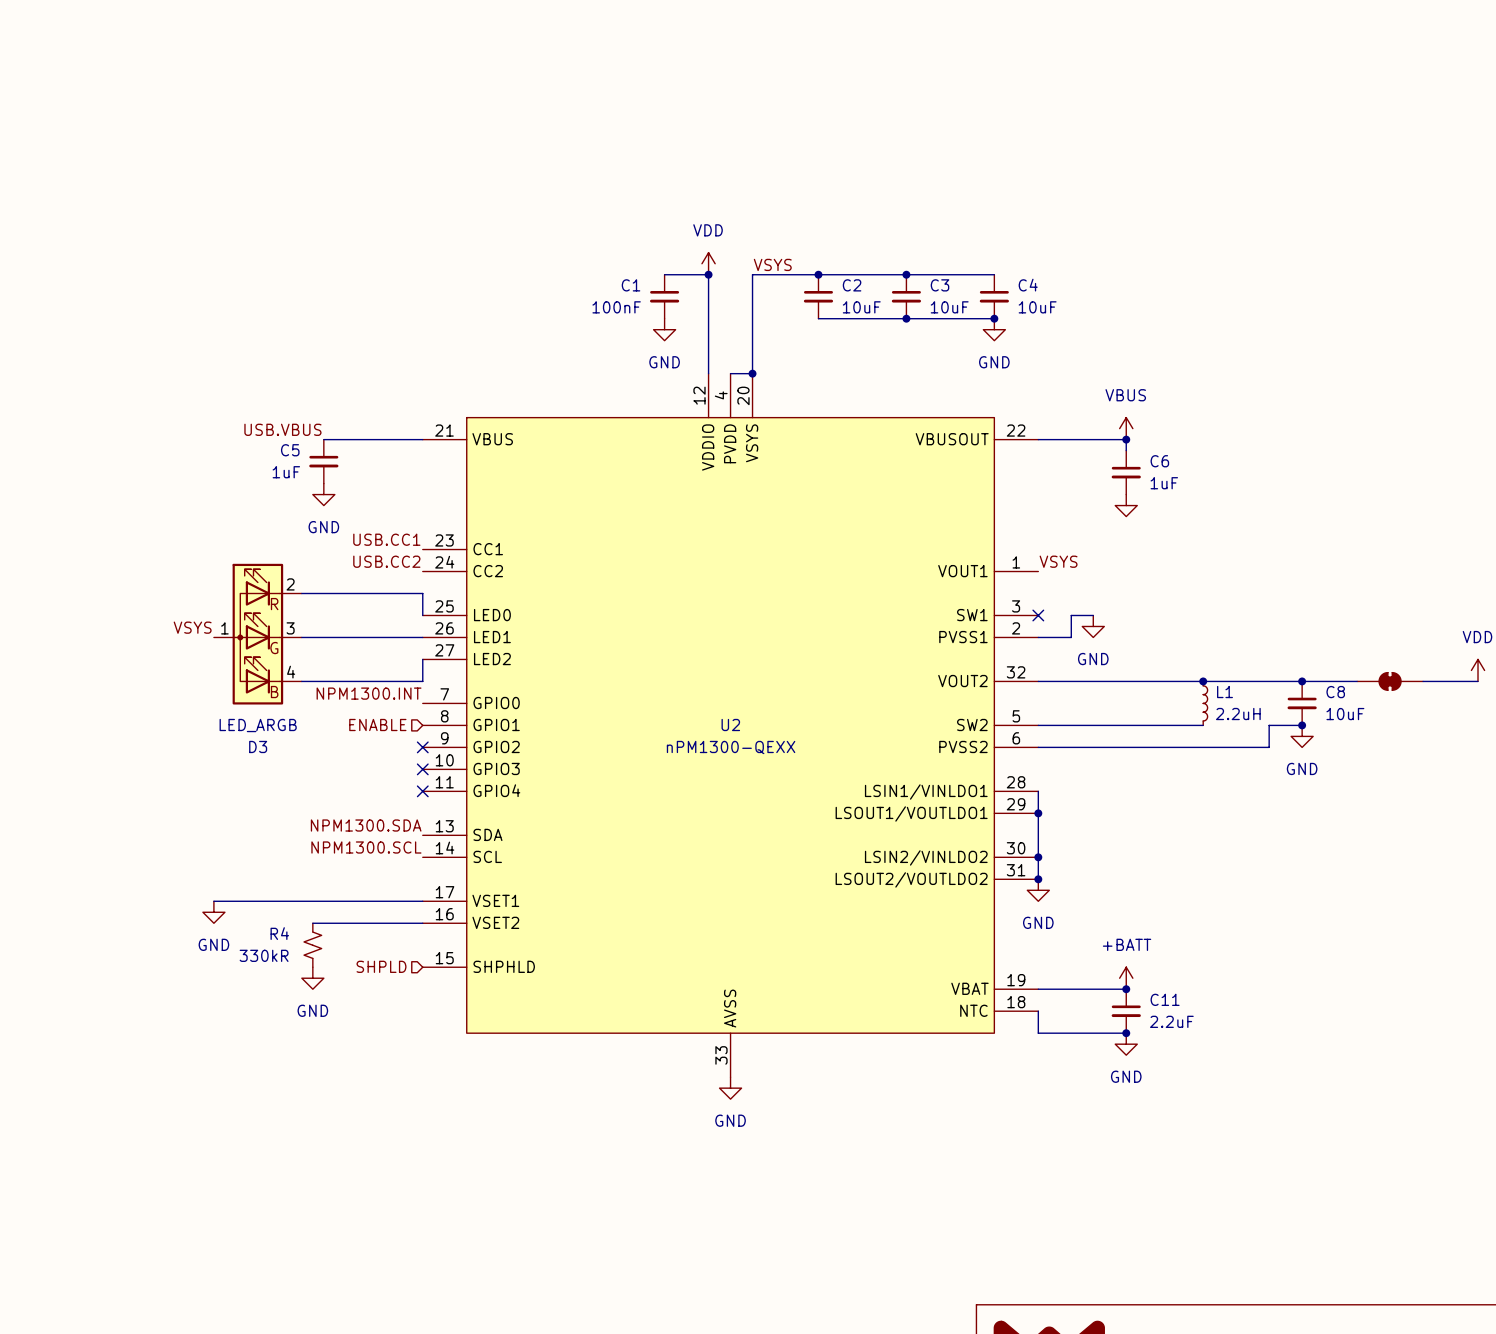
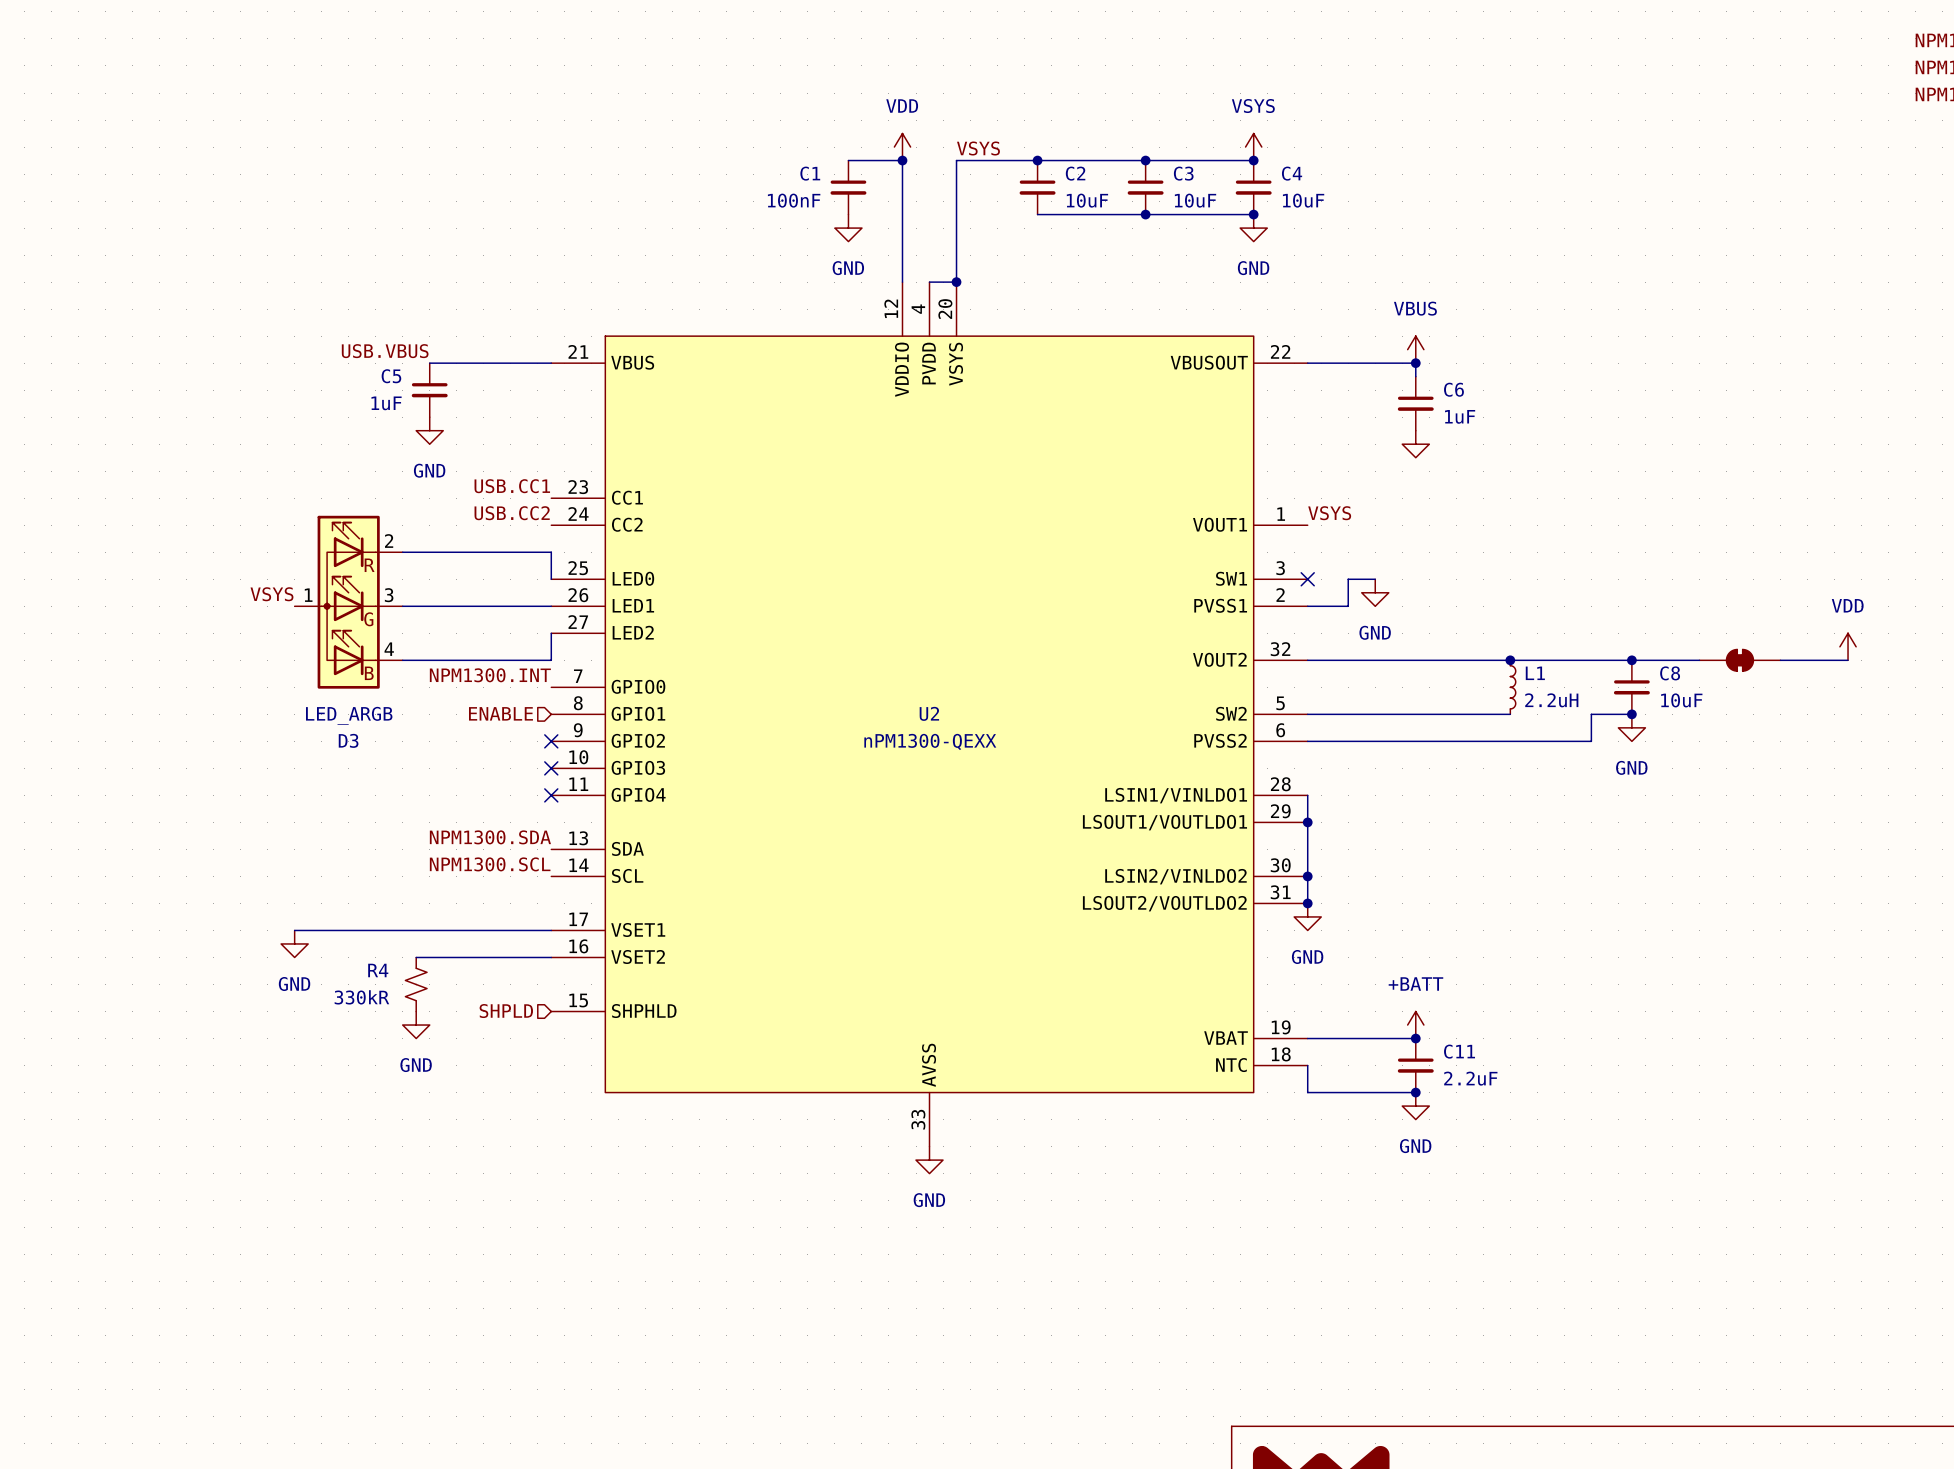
power symbol: none -> VSYS (1253, 147)
junction: none -> (1253, 160)

